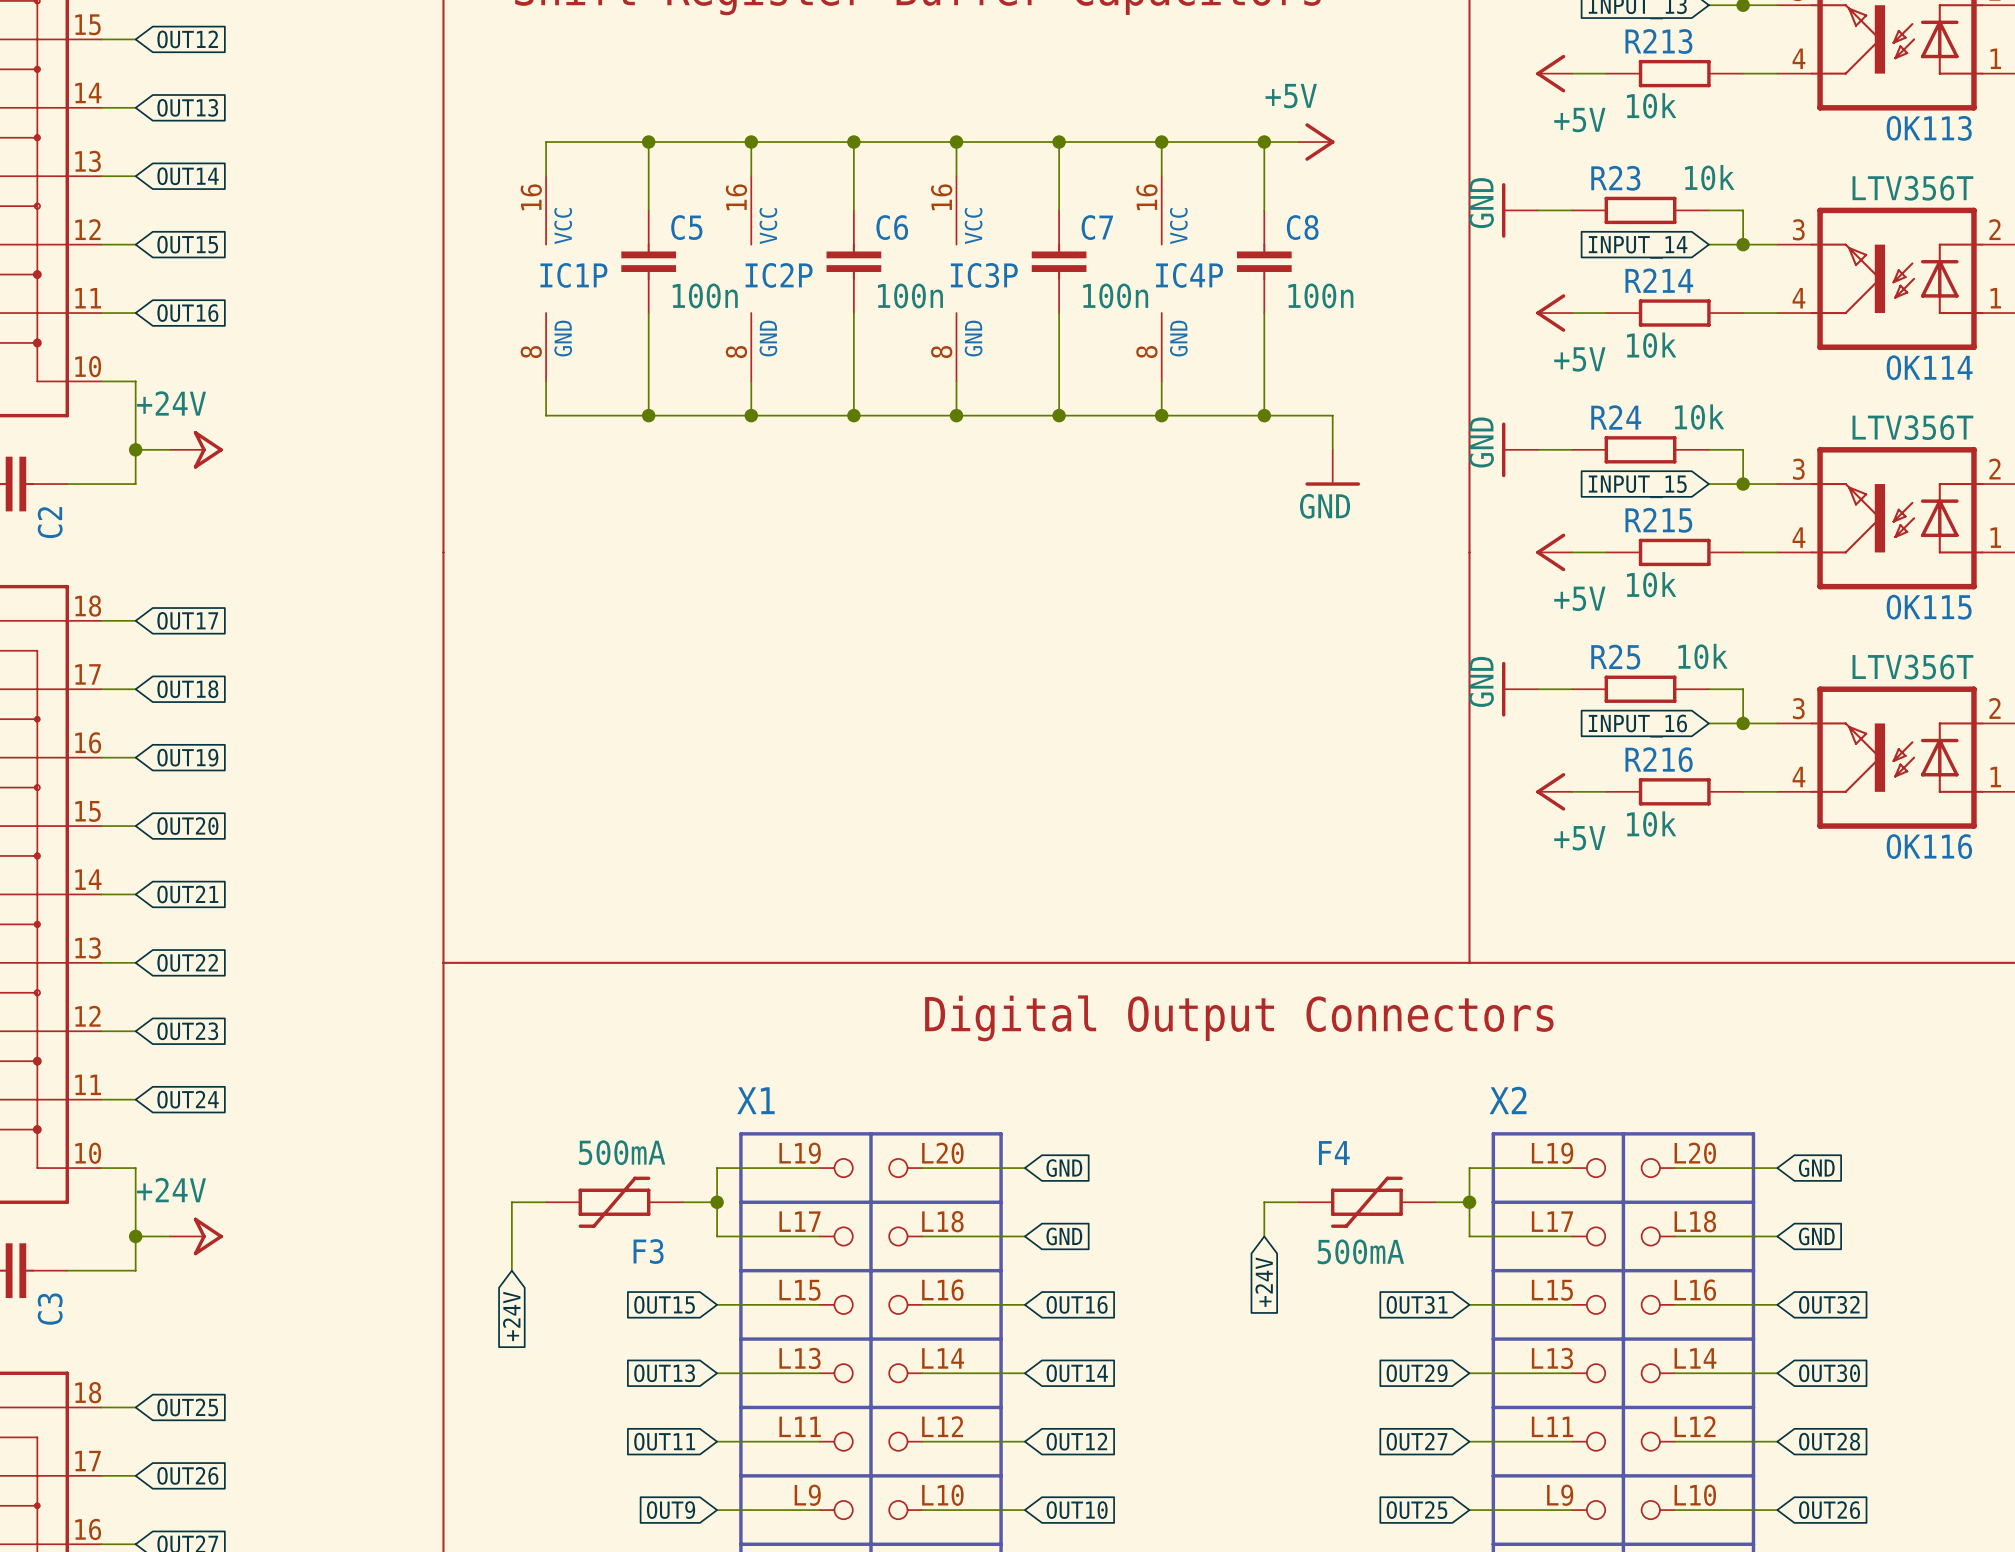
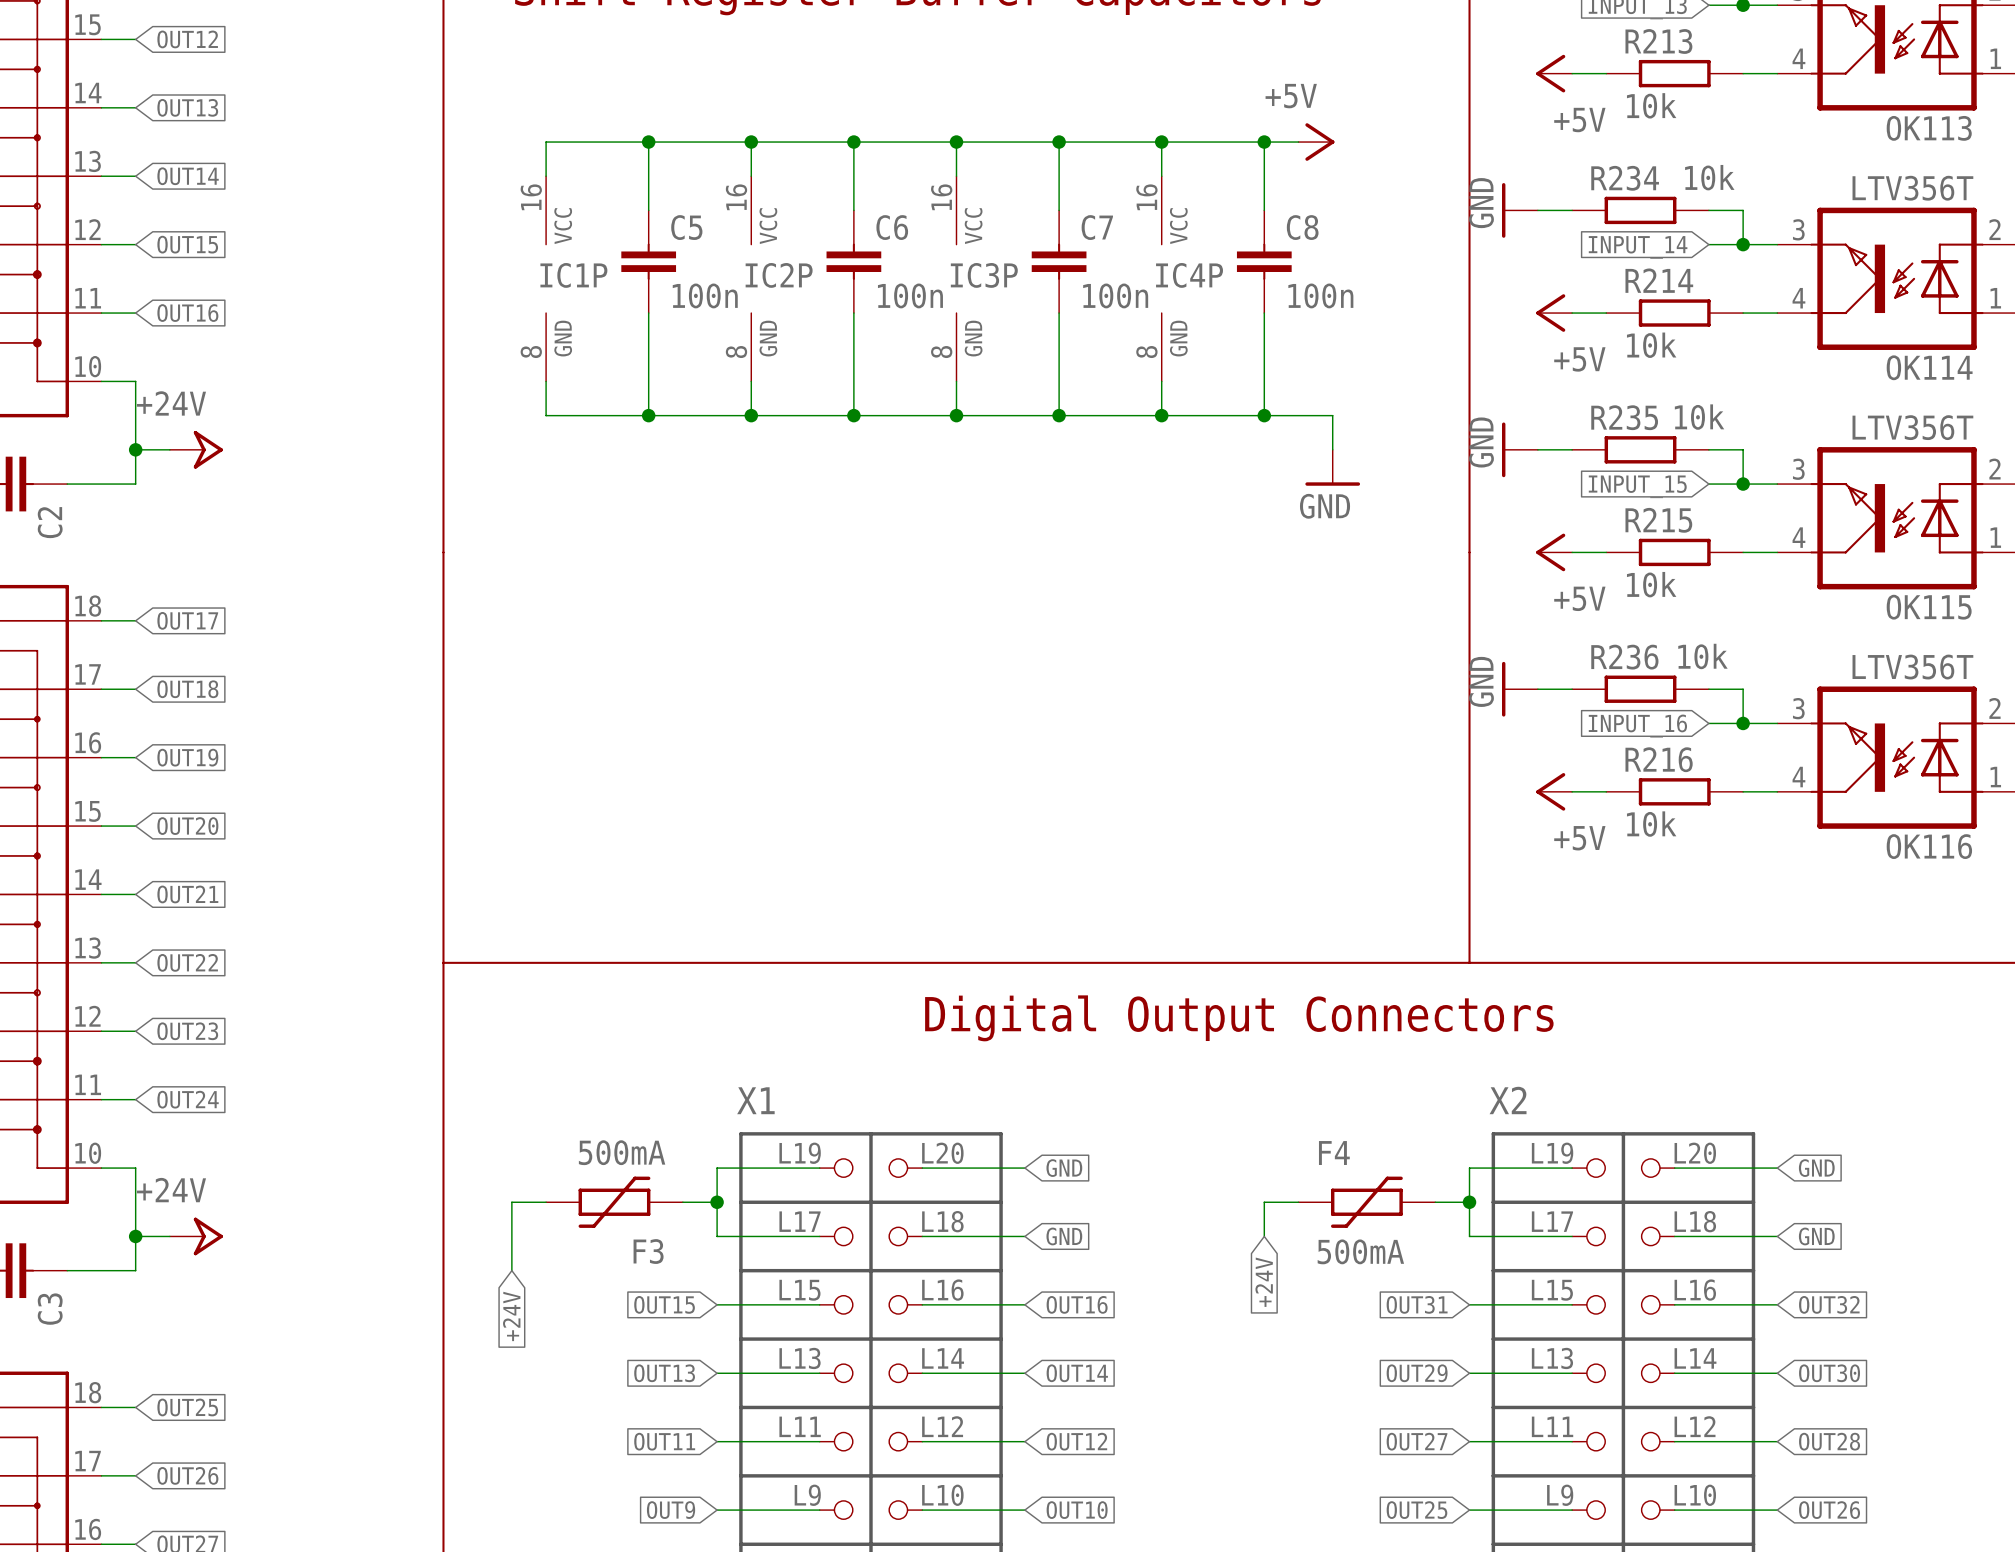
R23 name: R23 (1615, 178) -> R234 (1625, 178)
R24 name: R24 (1616, 417) -> R235 (1624, 417)
R25 name: R25 (1615, 657) -> R236 (1624, 657)

